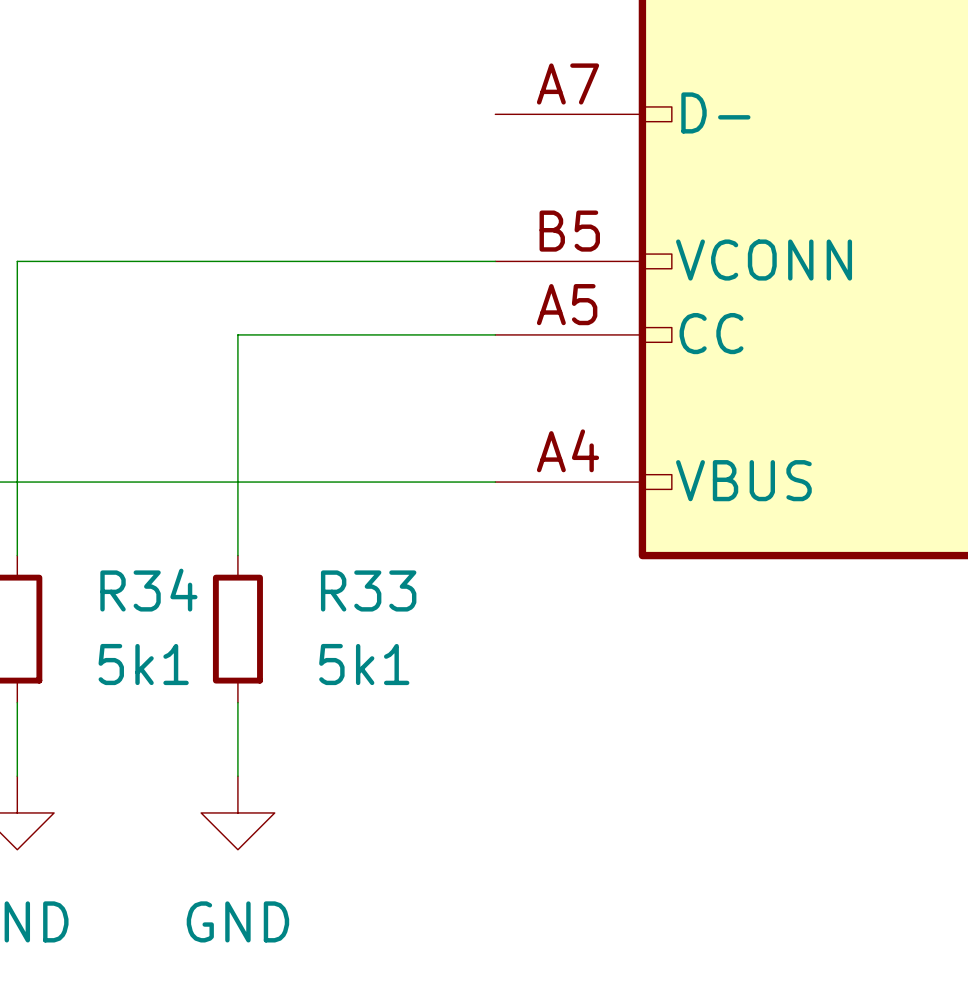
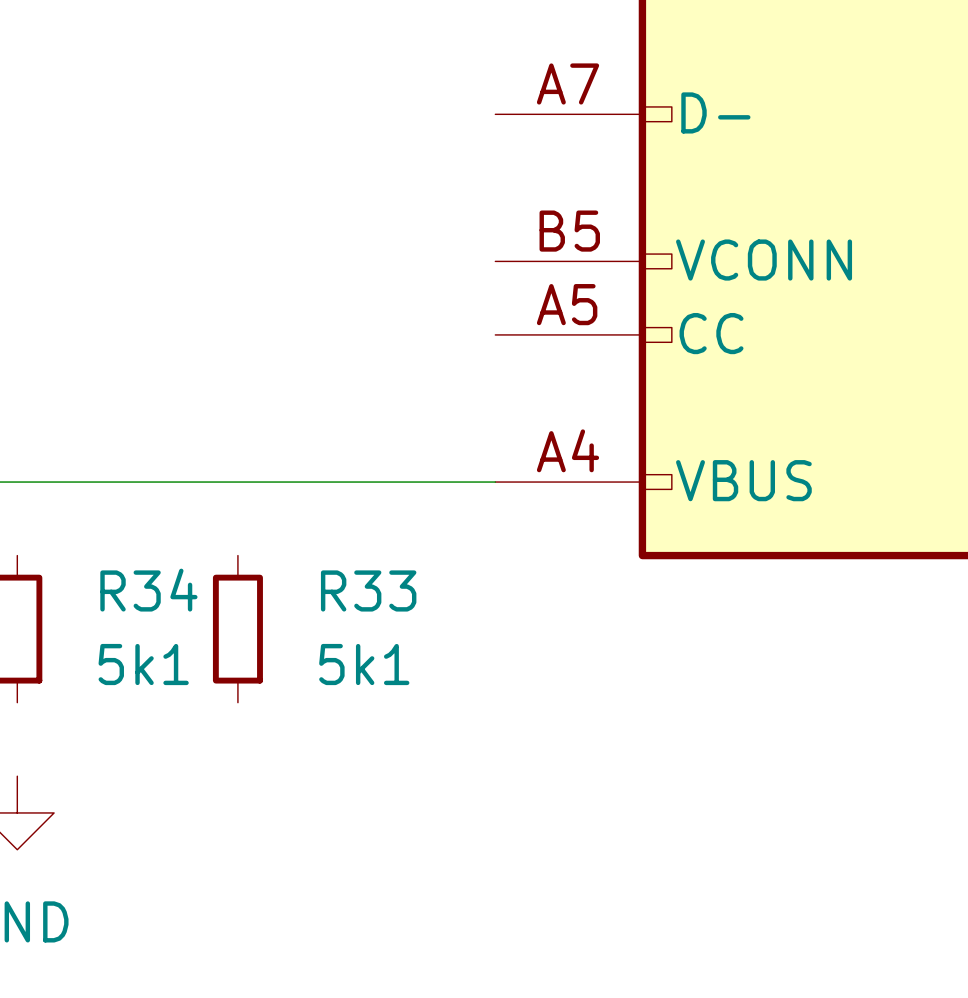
wire: (495, 261) (17, 261) (17, 555) -> none
wire: (495, 334) (237, 334) (237, 555) -> none
wire: (17, 702) (17, 776) -> none
wire: (237, 702) (237, 776) -> none
power symbol: GND (237, 812) -> none

